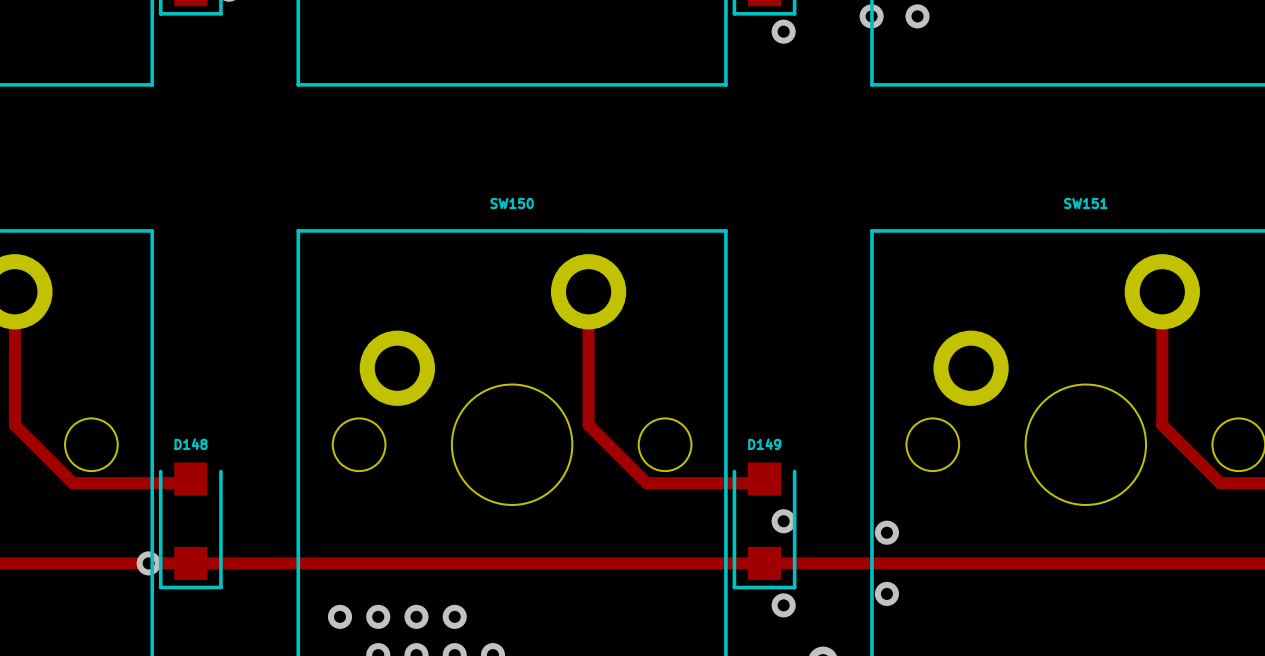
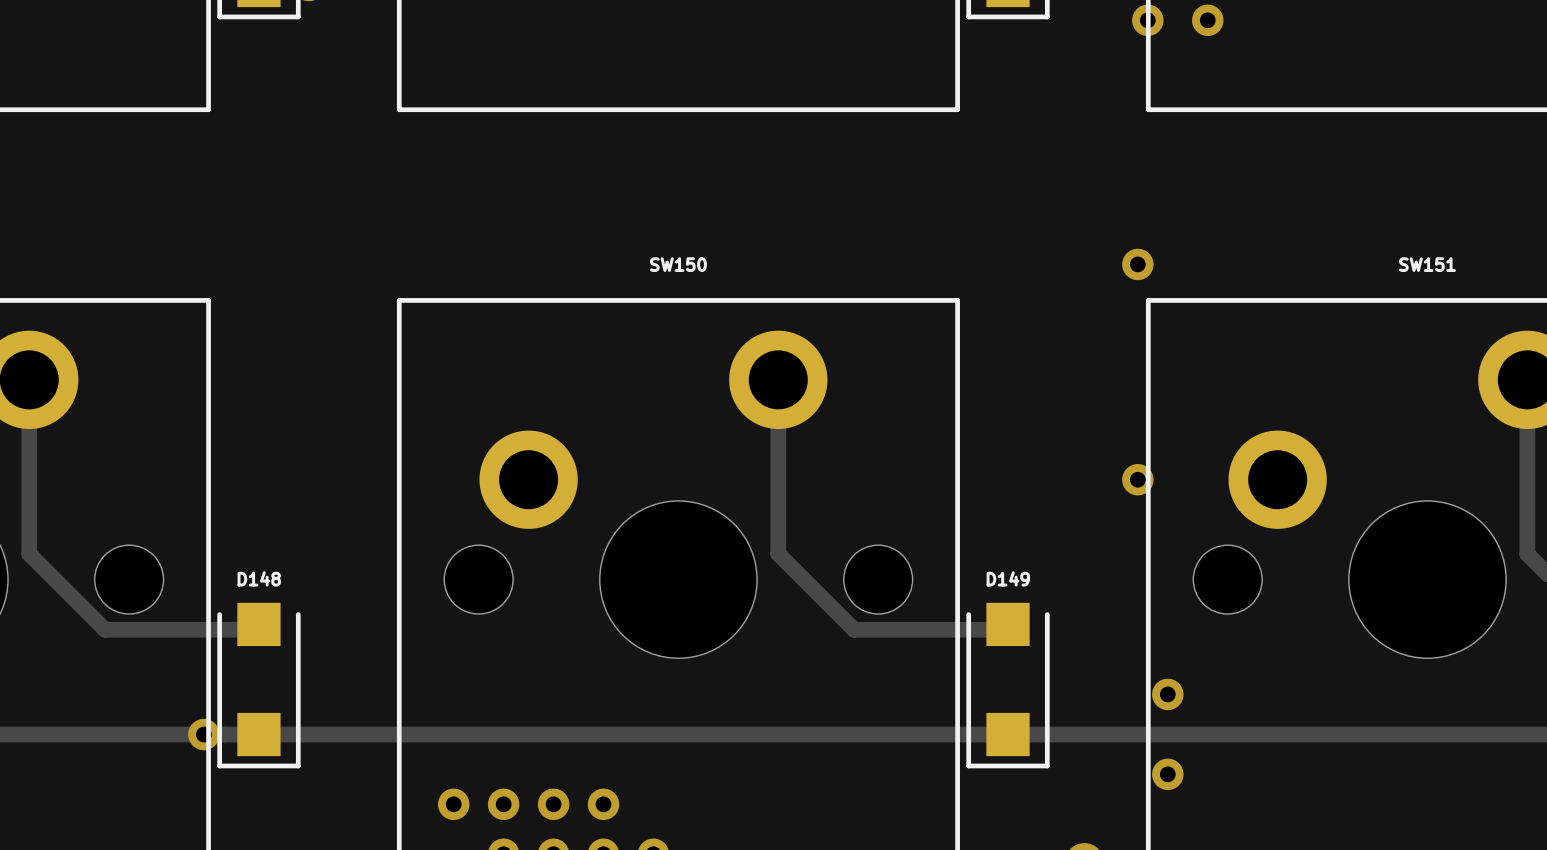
via: (783, 31) -> none
via: none -> (1137, 264)
via: none -> (1137, 479)
via: (783, 521) -> none
via: (783, 605) -> none

